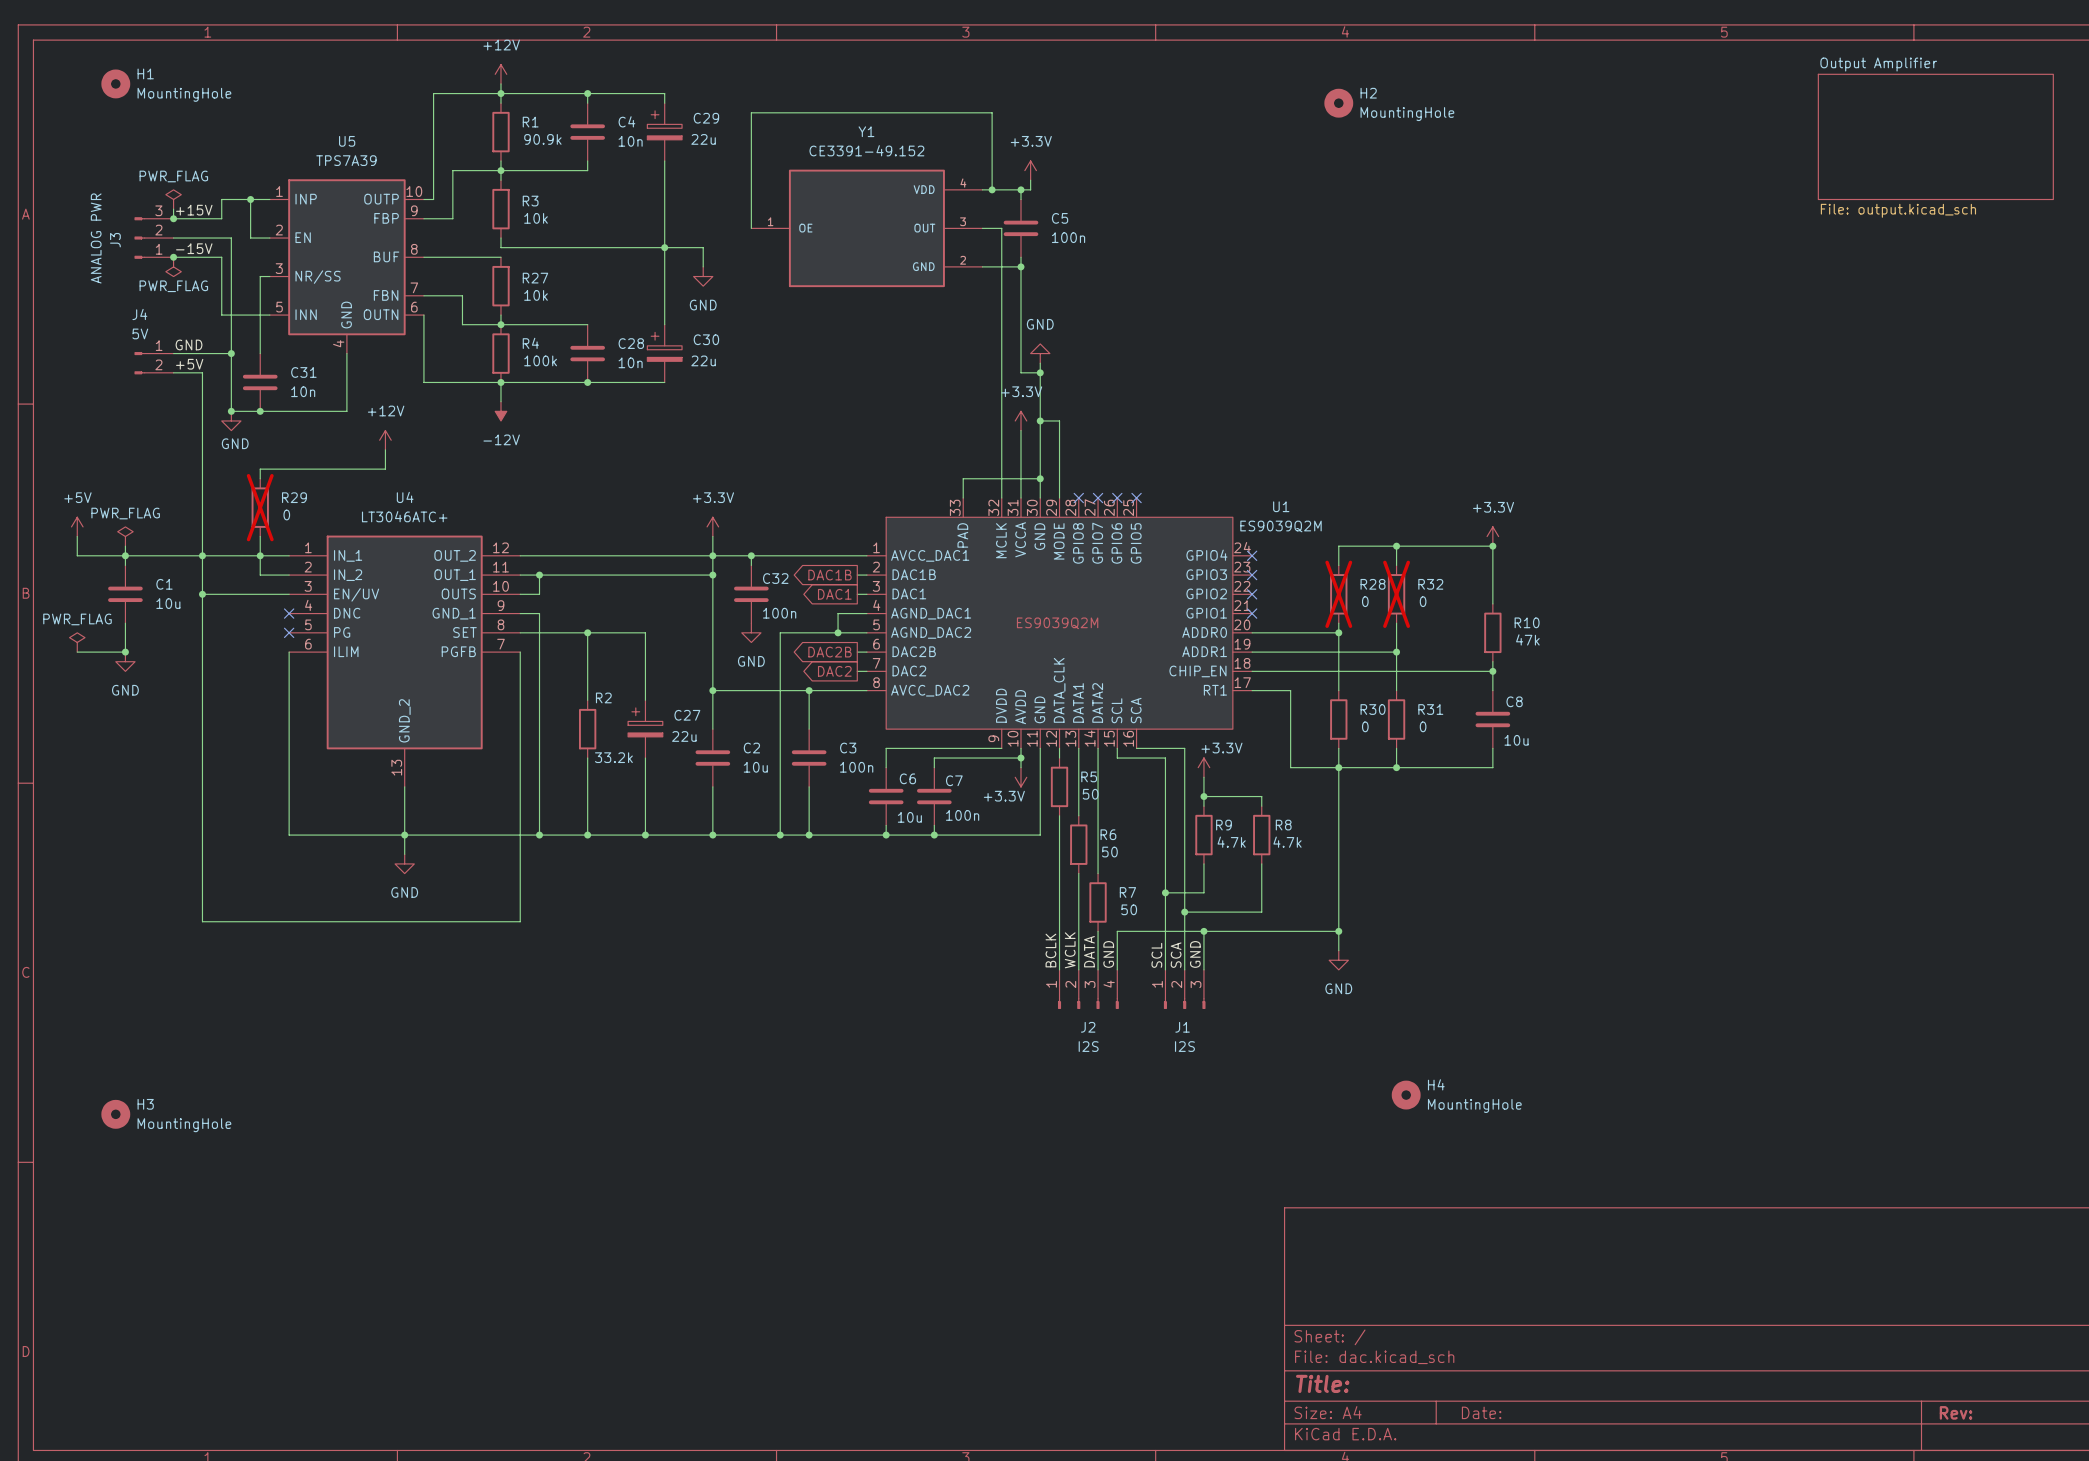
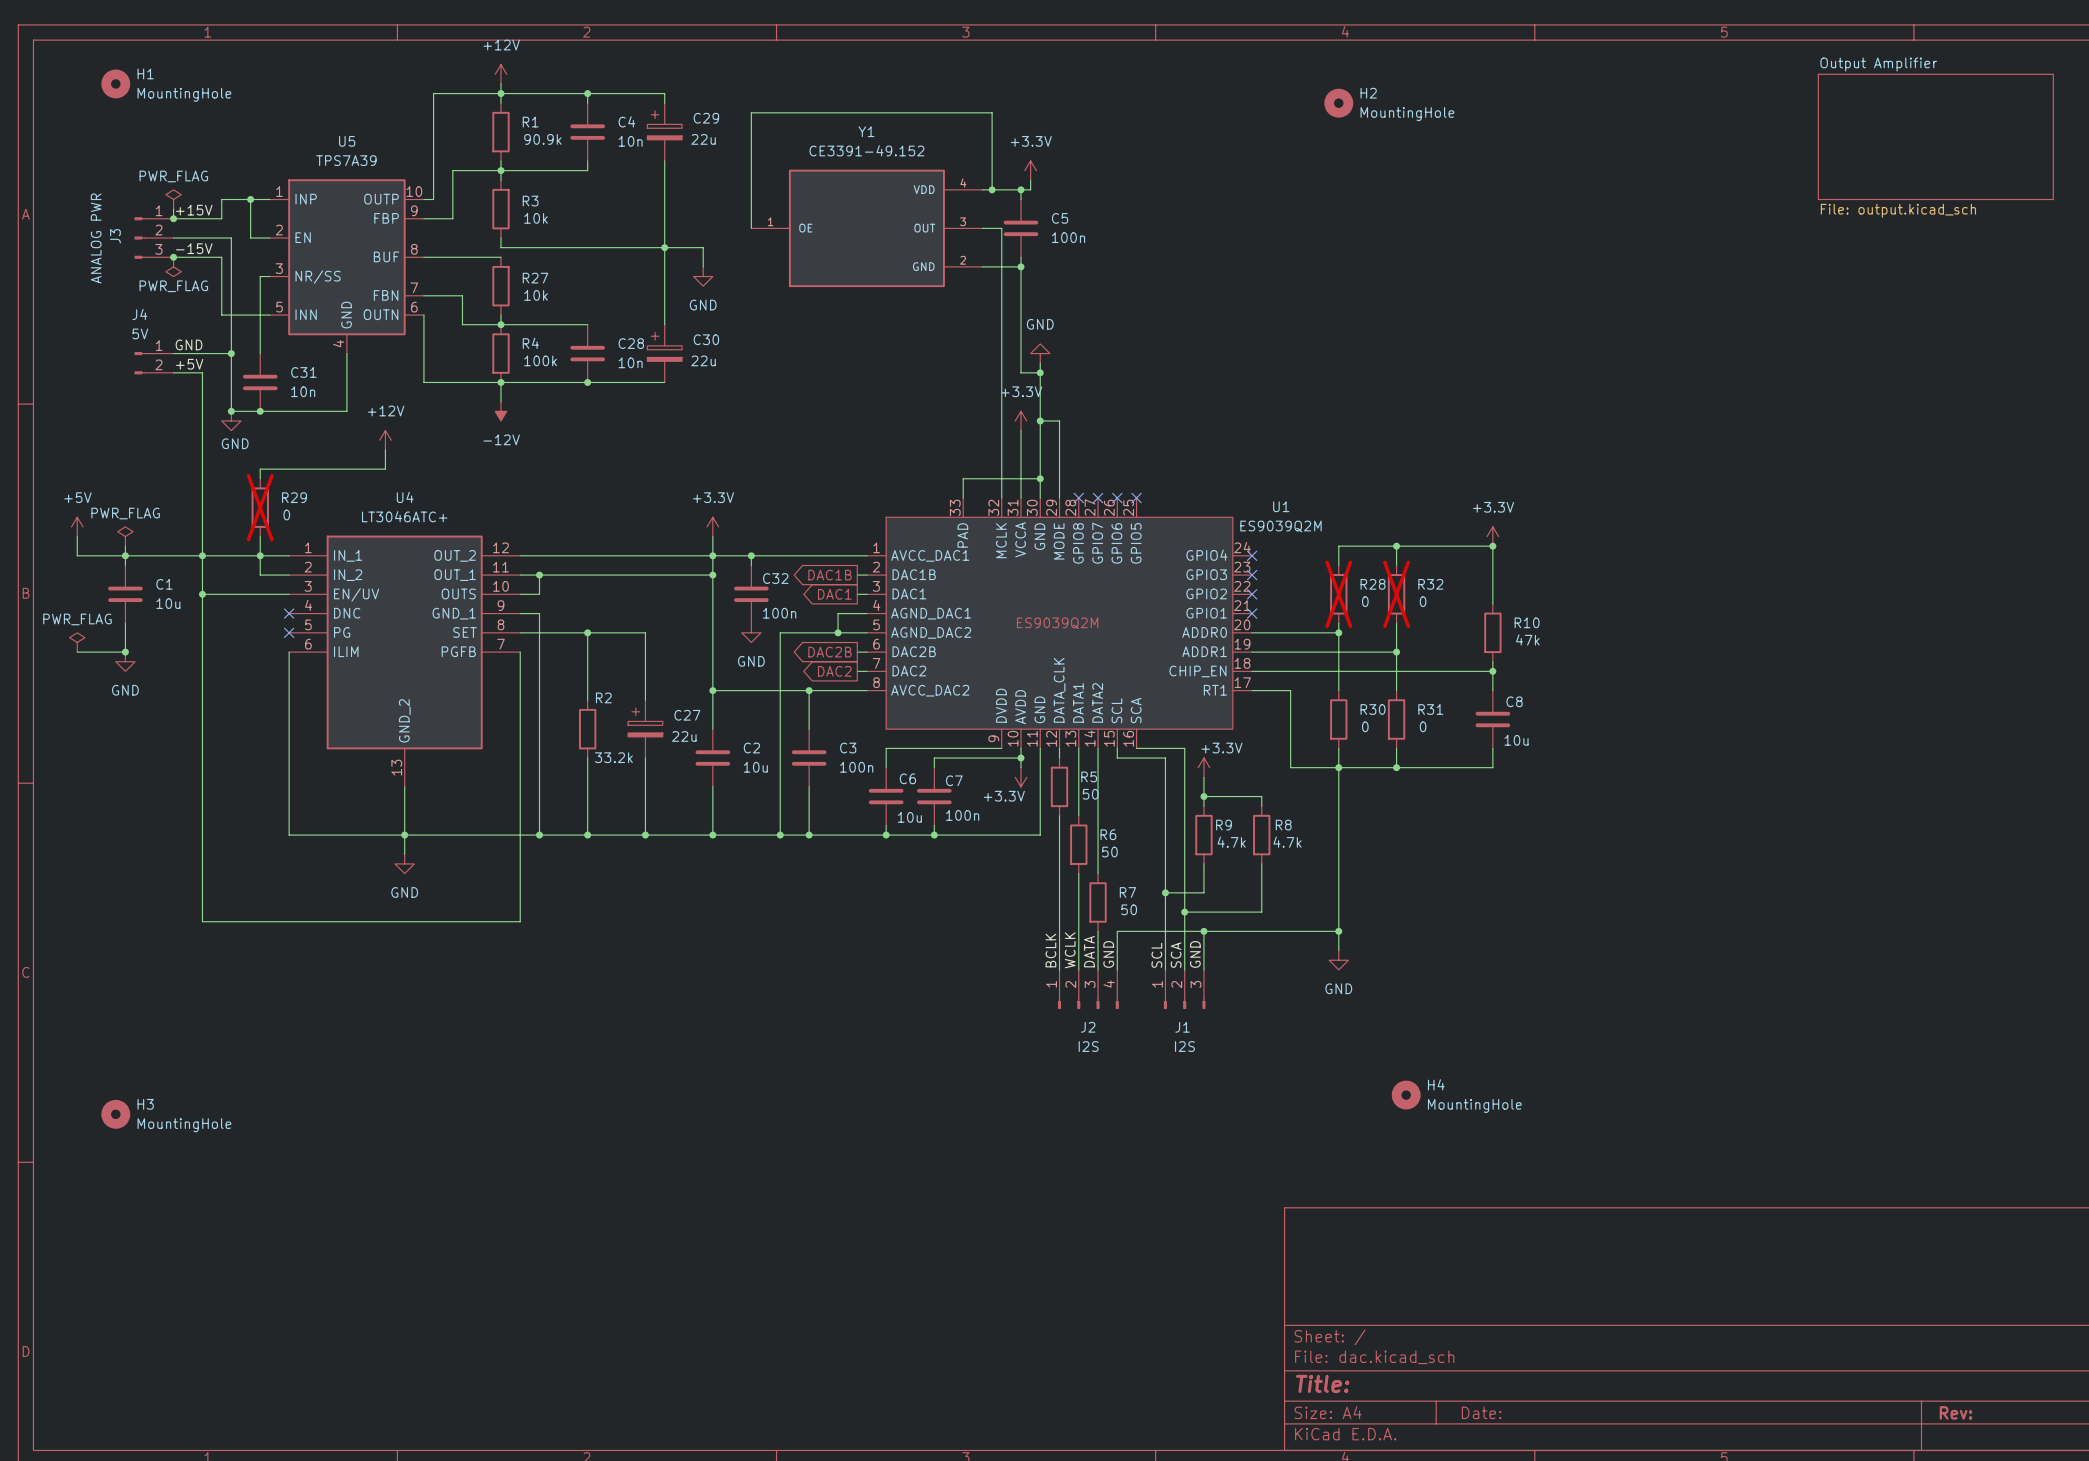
J3 flip: as is (139, 238) -> up-down (139, 238)

